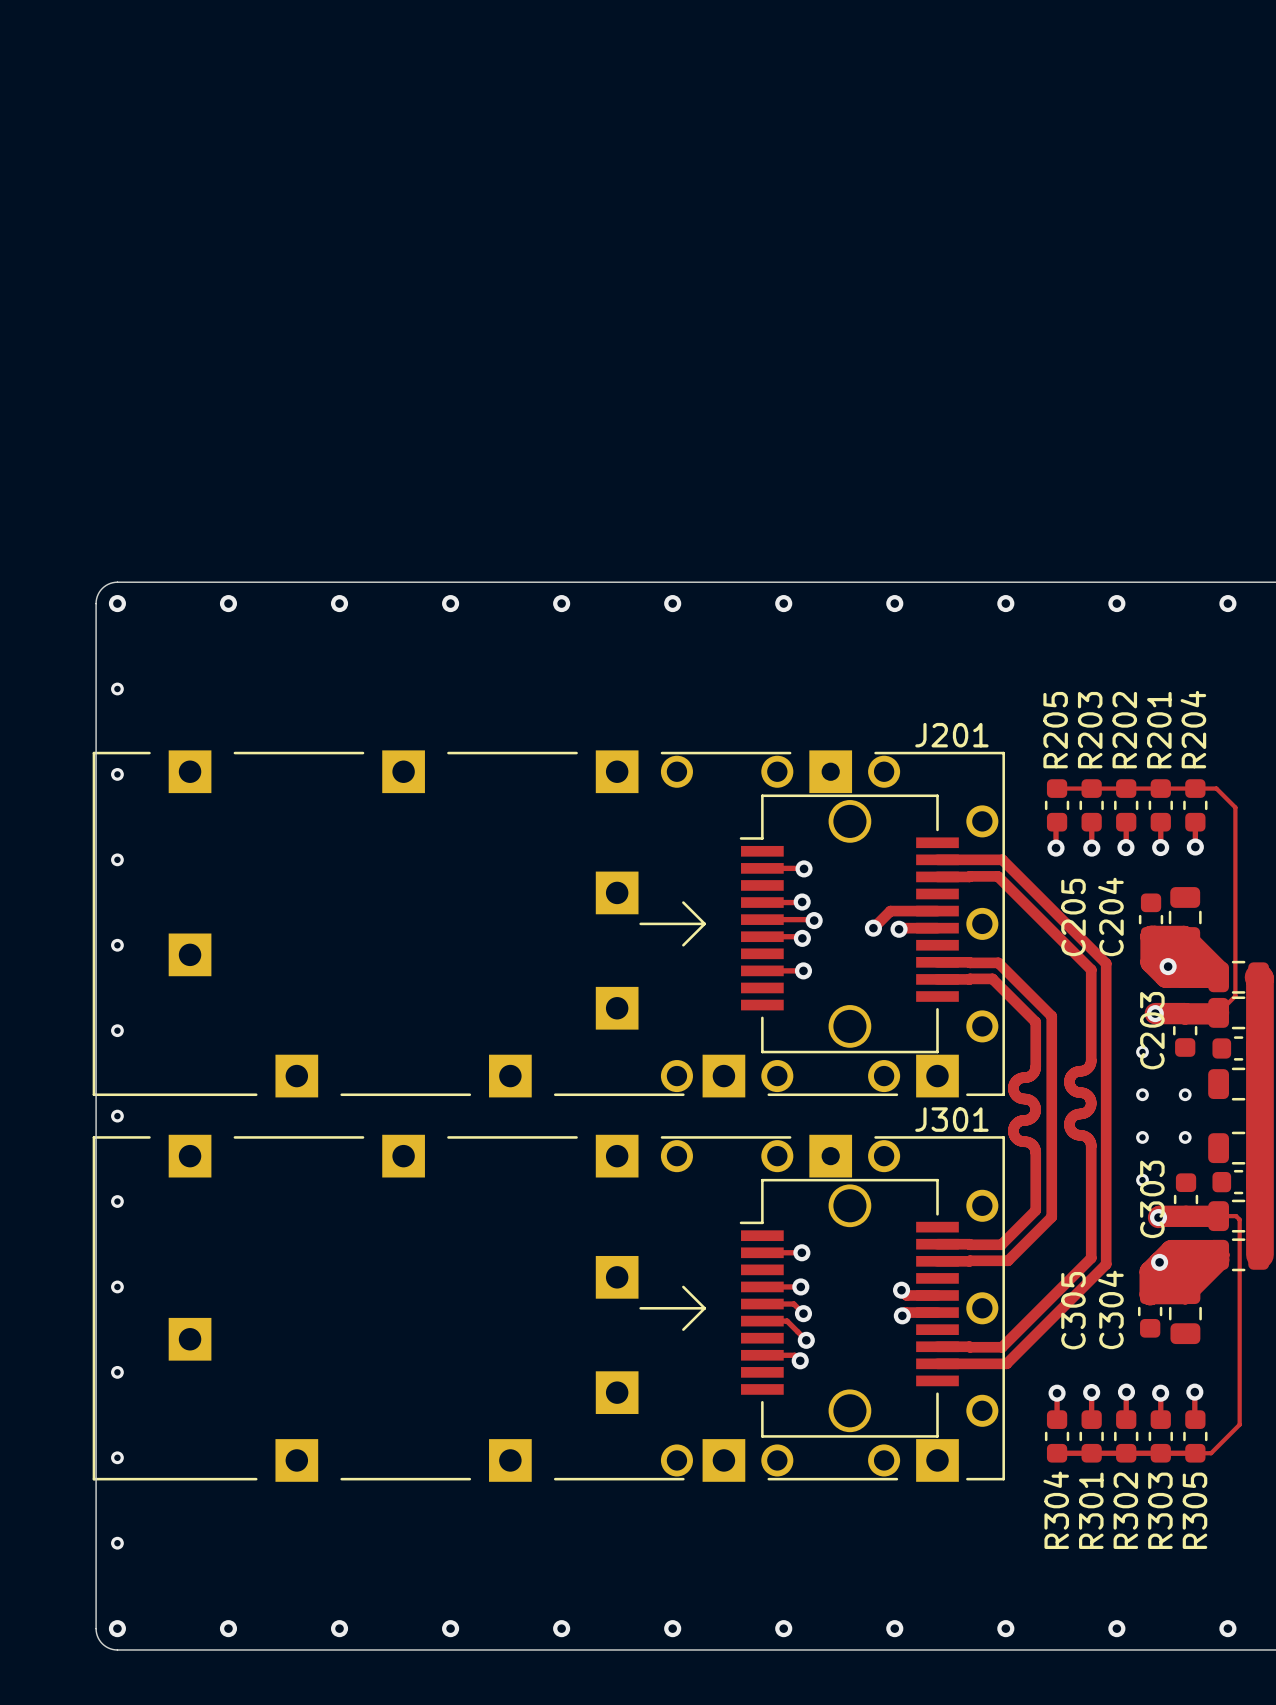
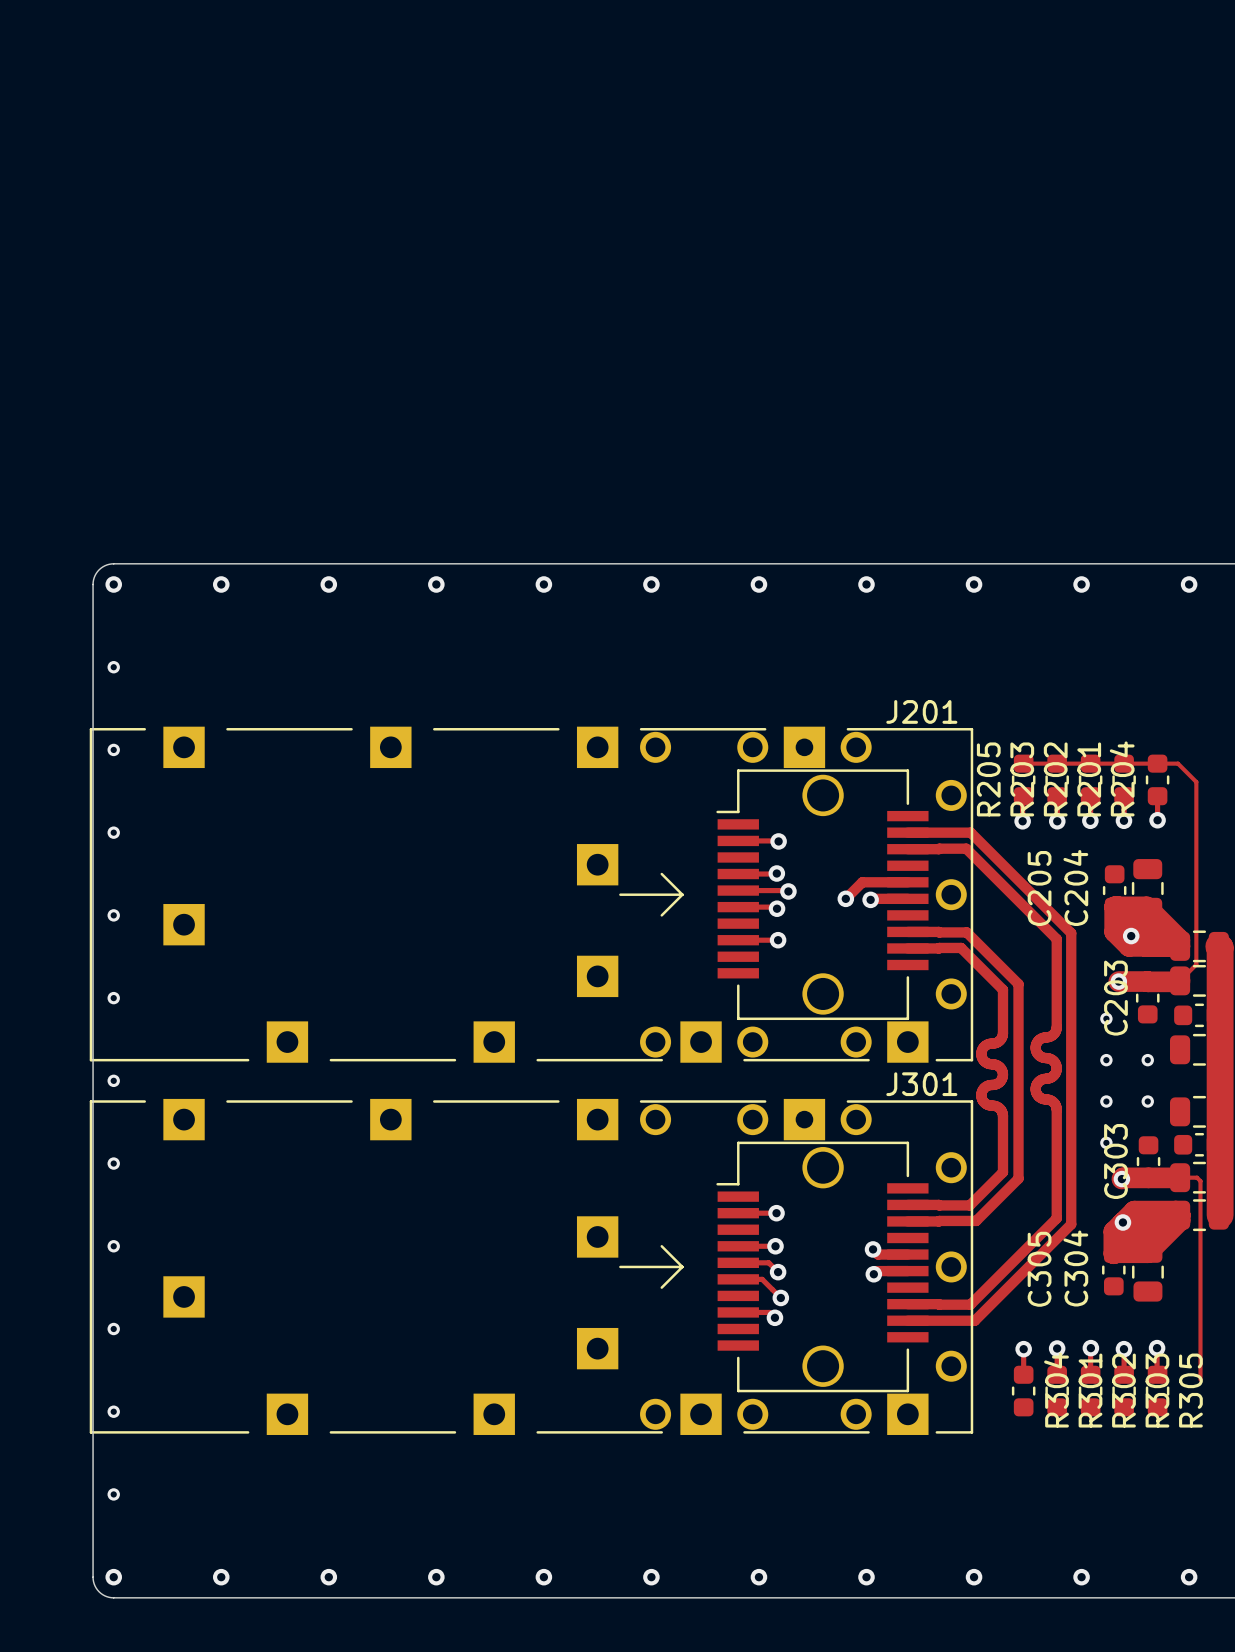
R204 name position: R204 (1193, 729) -> R204 (1122, 778)
R205 name position: R205 (1055, 730) -> R205 (988, 779)
R203 name position: R203 (1090, 730) -> R203 (1022, 779)
R202 name position: R202 (1124, 730) -> R202 (1055, 779)
R201 name position: R201 (1159, 730) -> R201 (1089, 779)
track: (1239, 1424) (1211, 1453) (1057, 1453) -> none
R304 name position: R304 (1056, 1510) -> R304 (1056, 1390)
R301 name position: R301 (1091, 1510) -> R301 (1090, 1390)
R302 name position: R302 (1125, 1510) -> R302 (1123, 1390)
R303 name position: R303 (1160, 1510) -> R303 (1157, 1390)
R305 name position: R305 (1194, 1510) -> R305 (1190, 1390)

